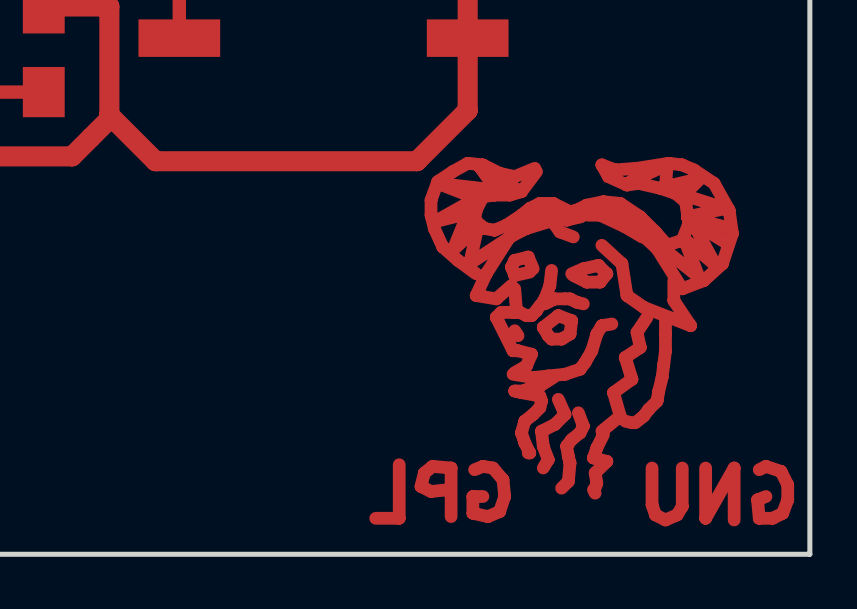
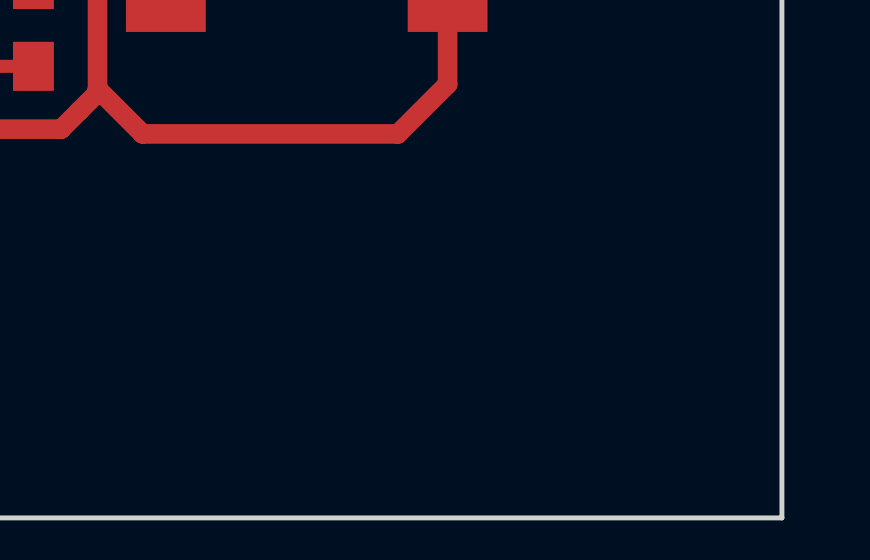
drawing: [369, 156, 795, 527] -> none

